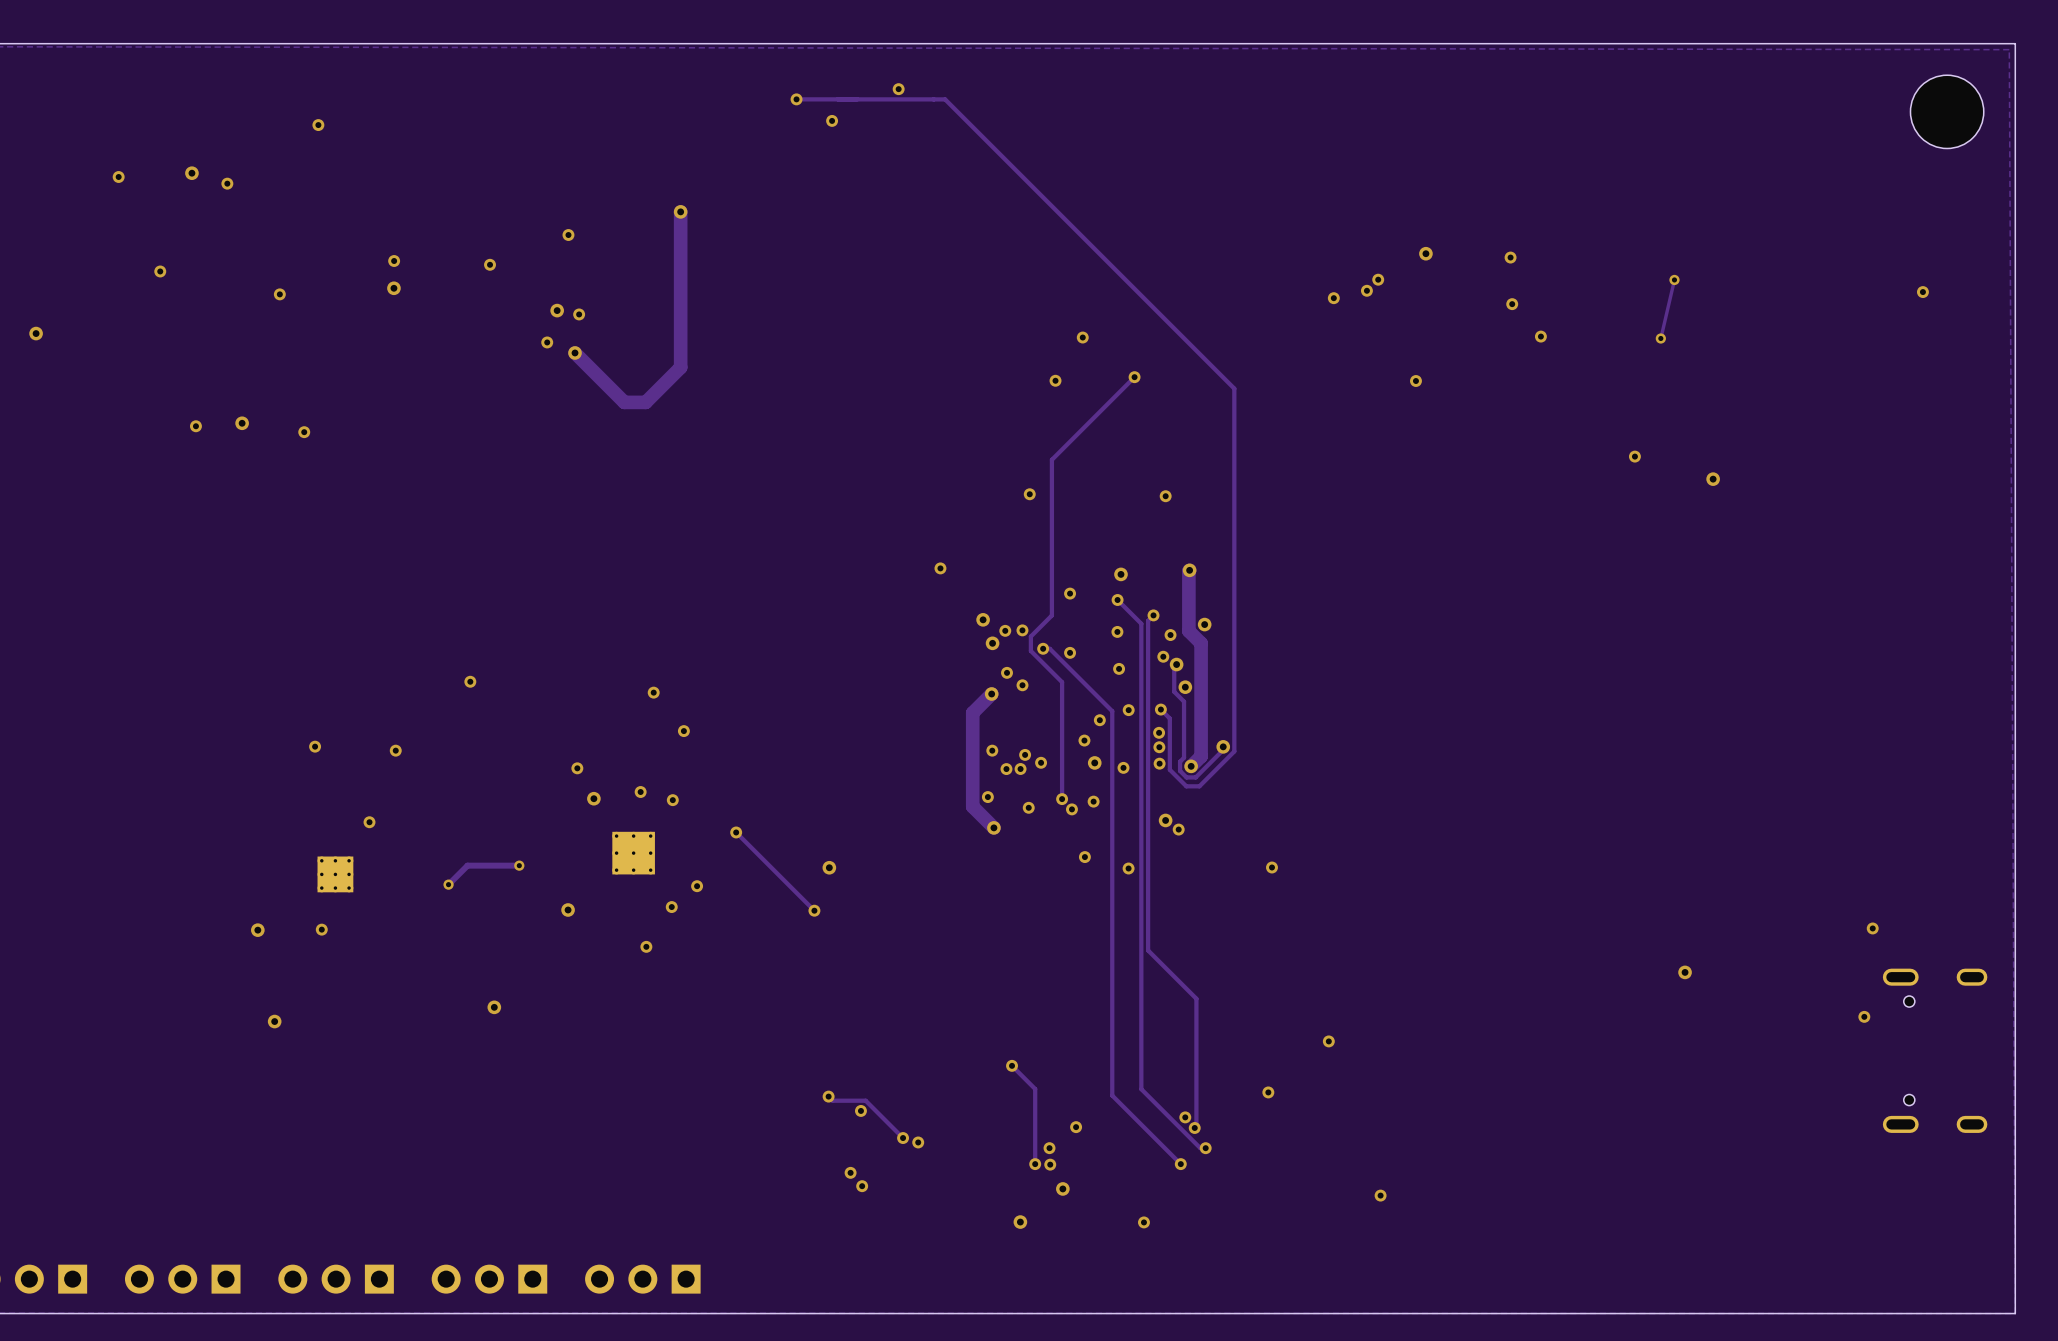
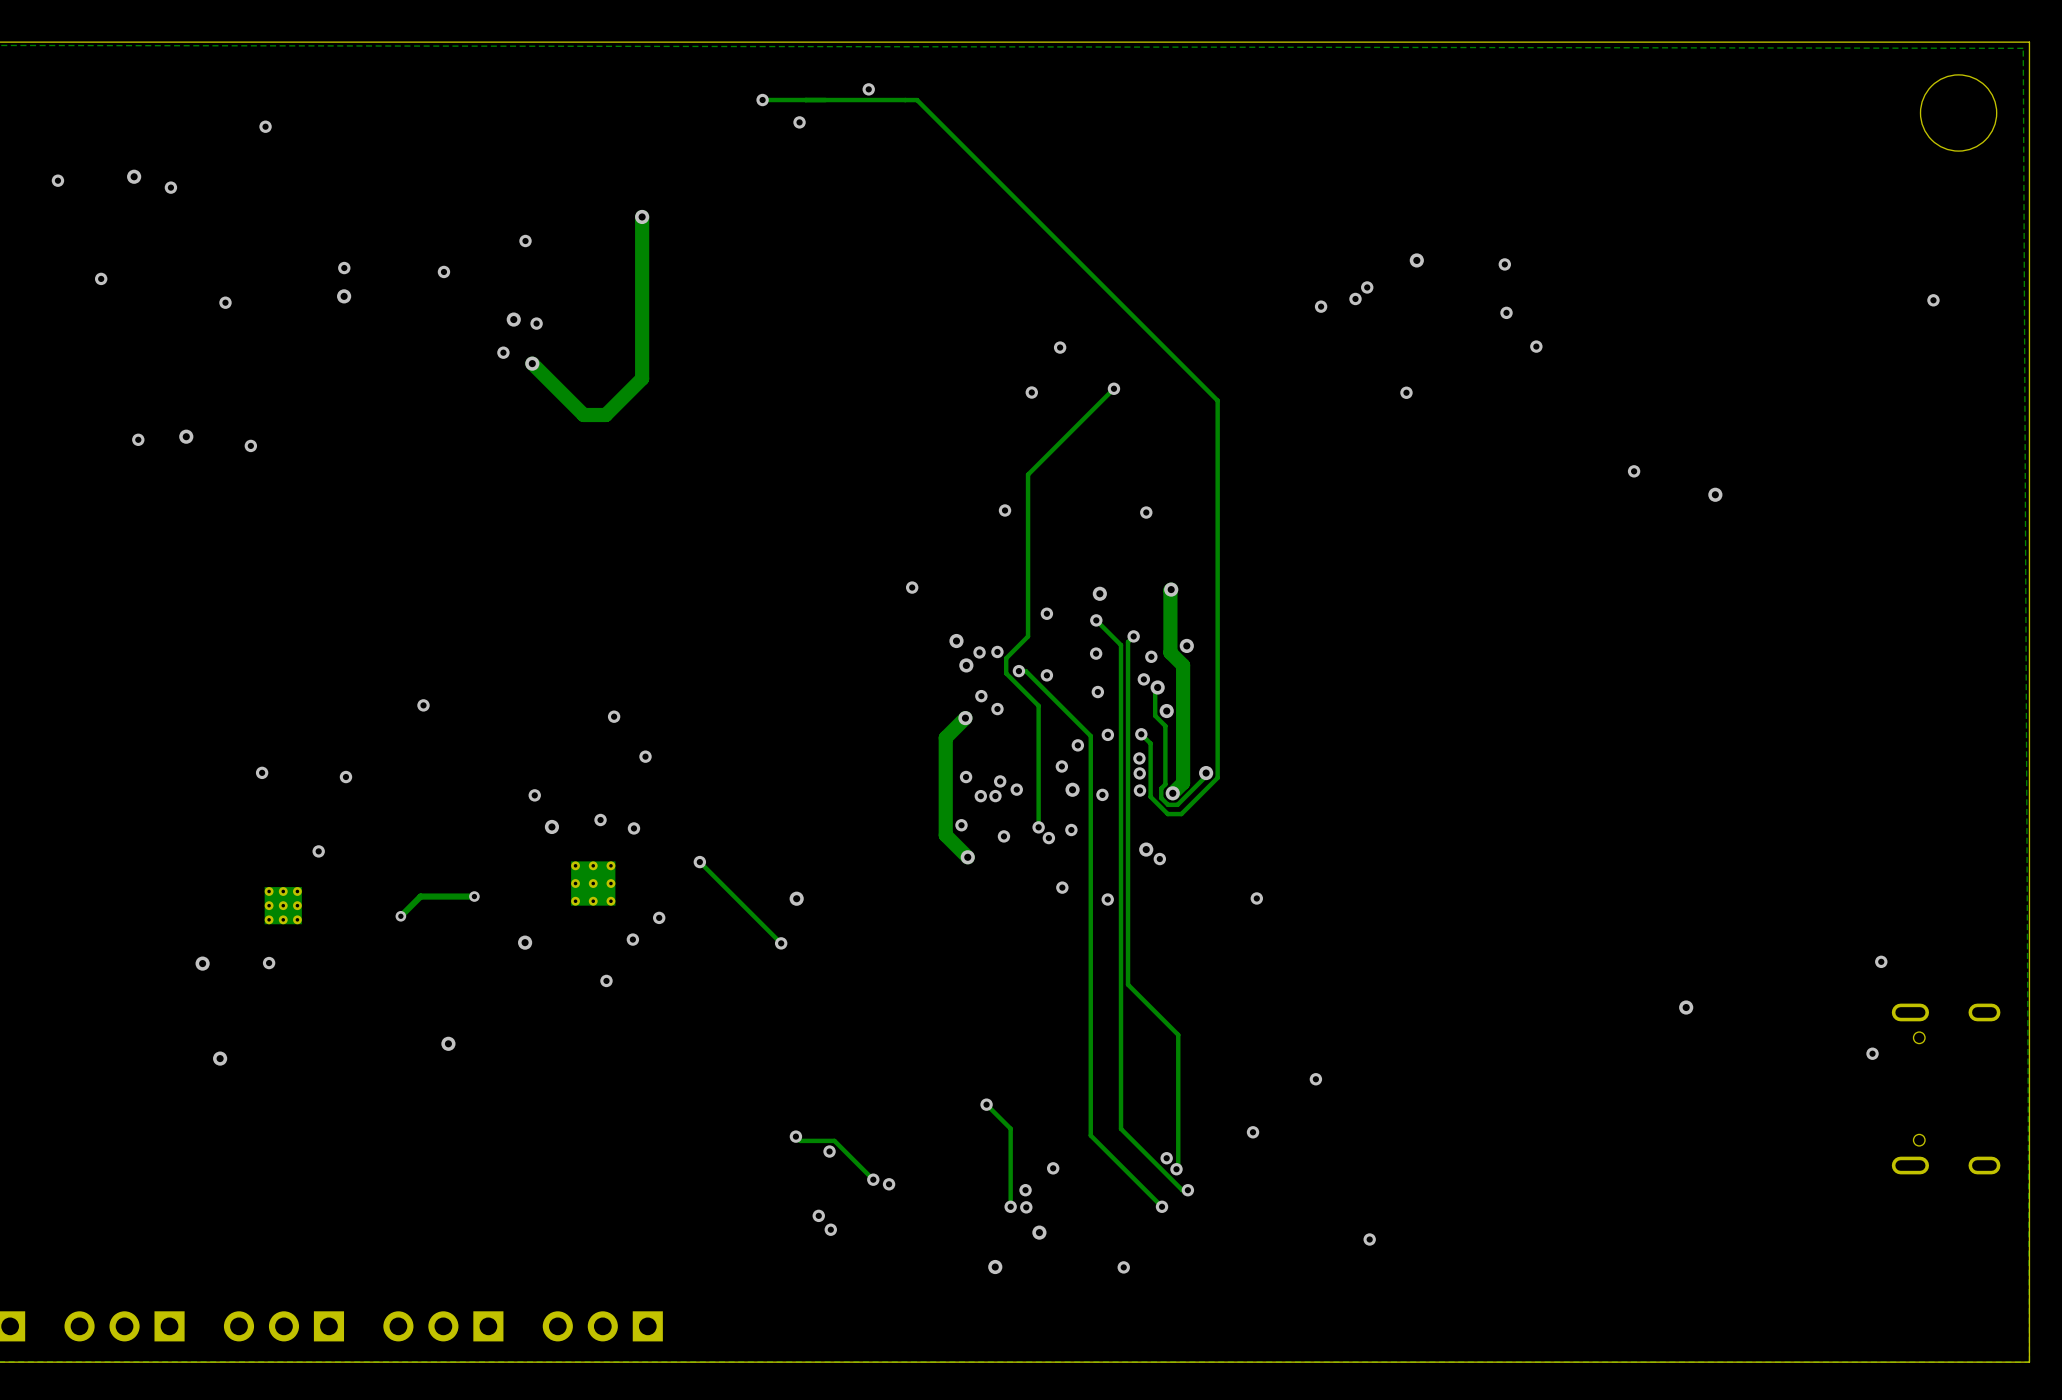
track: (1674, 279) (1660, 338) -> none
via: (1674, 279) -> none
via: (1660, 338) -> none

